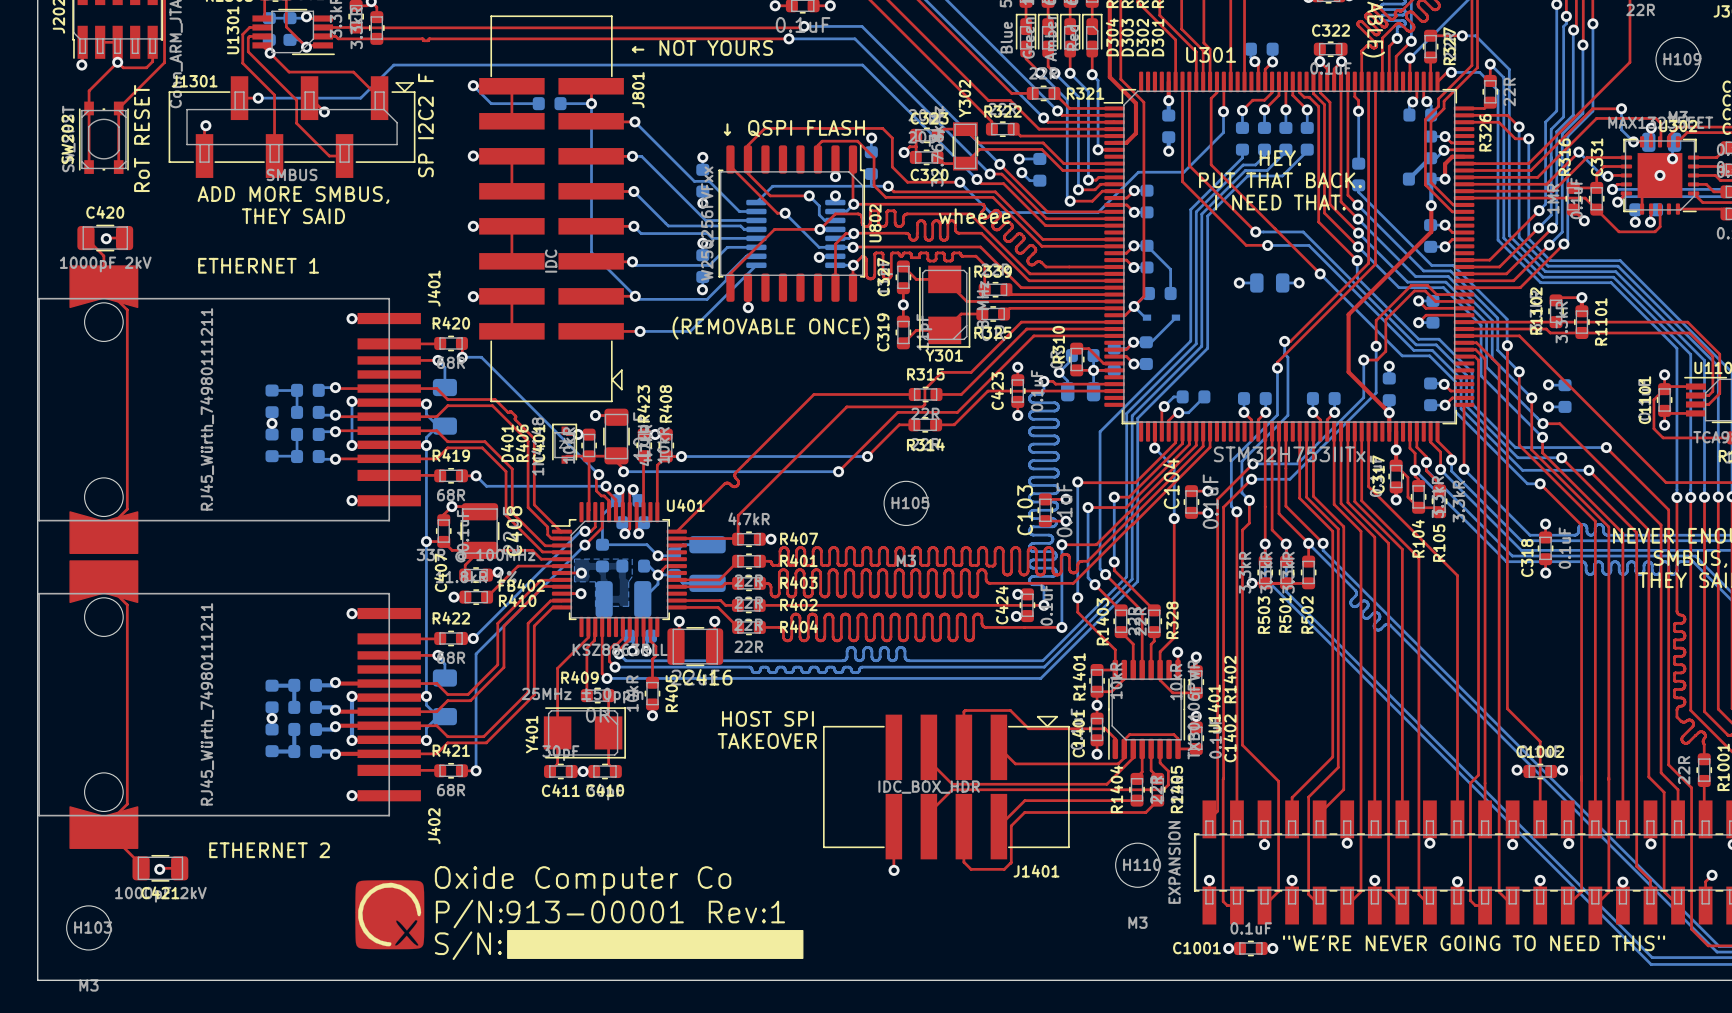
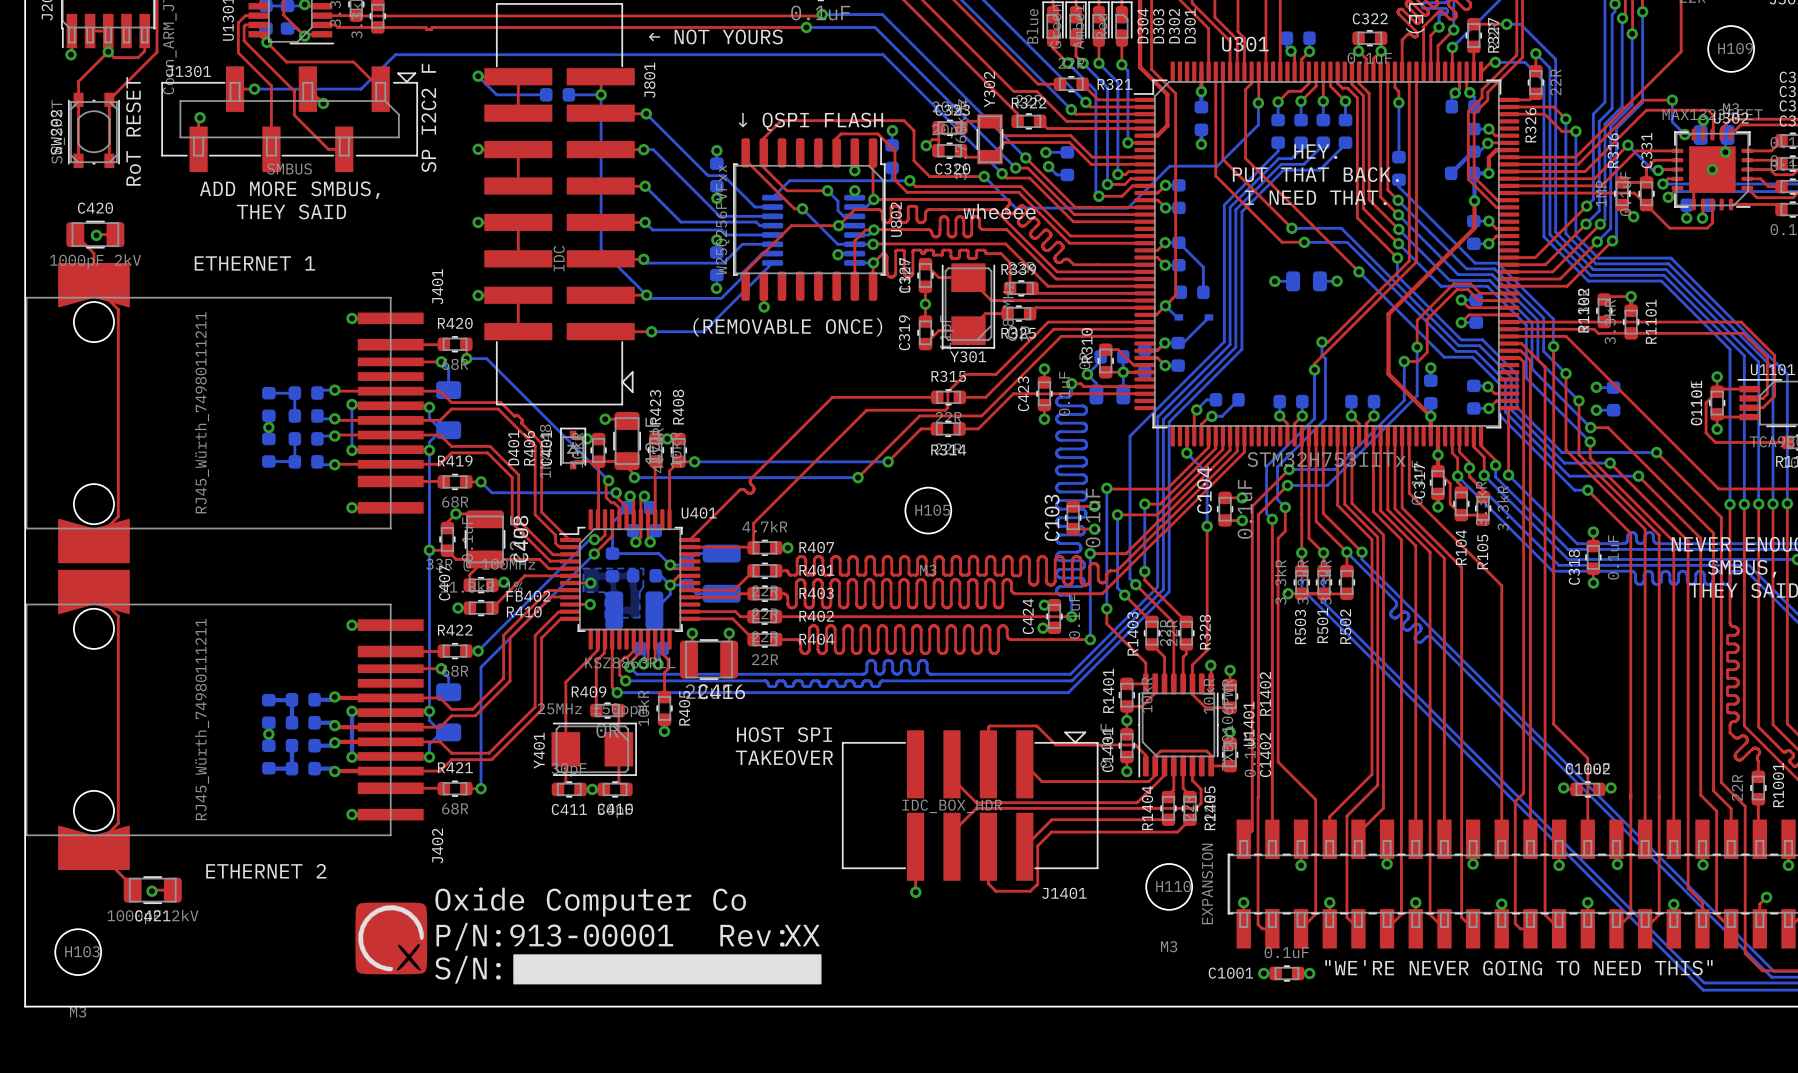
drawing shape: [355, 866, 804, 961] -> [355, 887, 822, 985]

